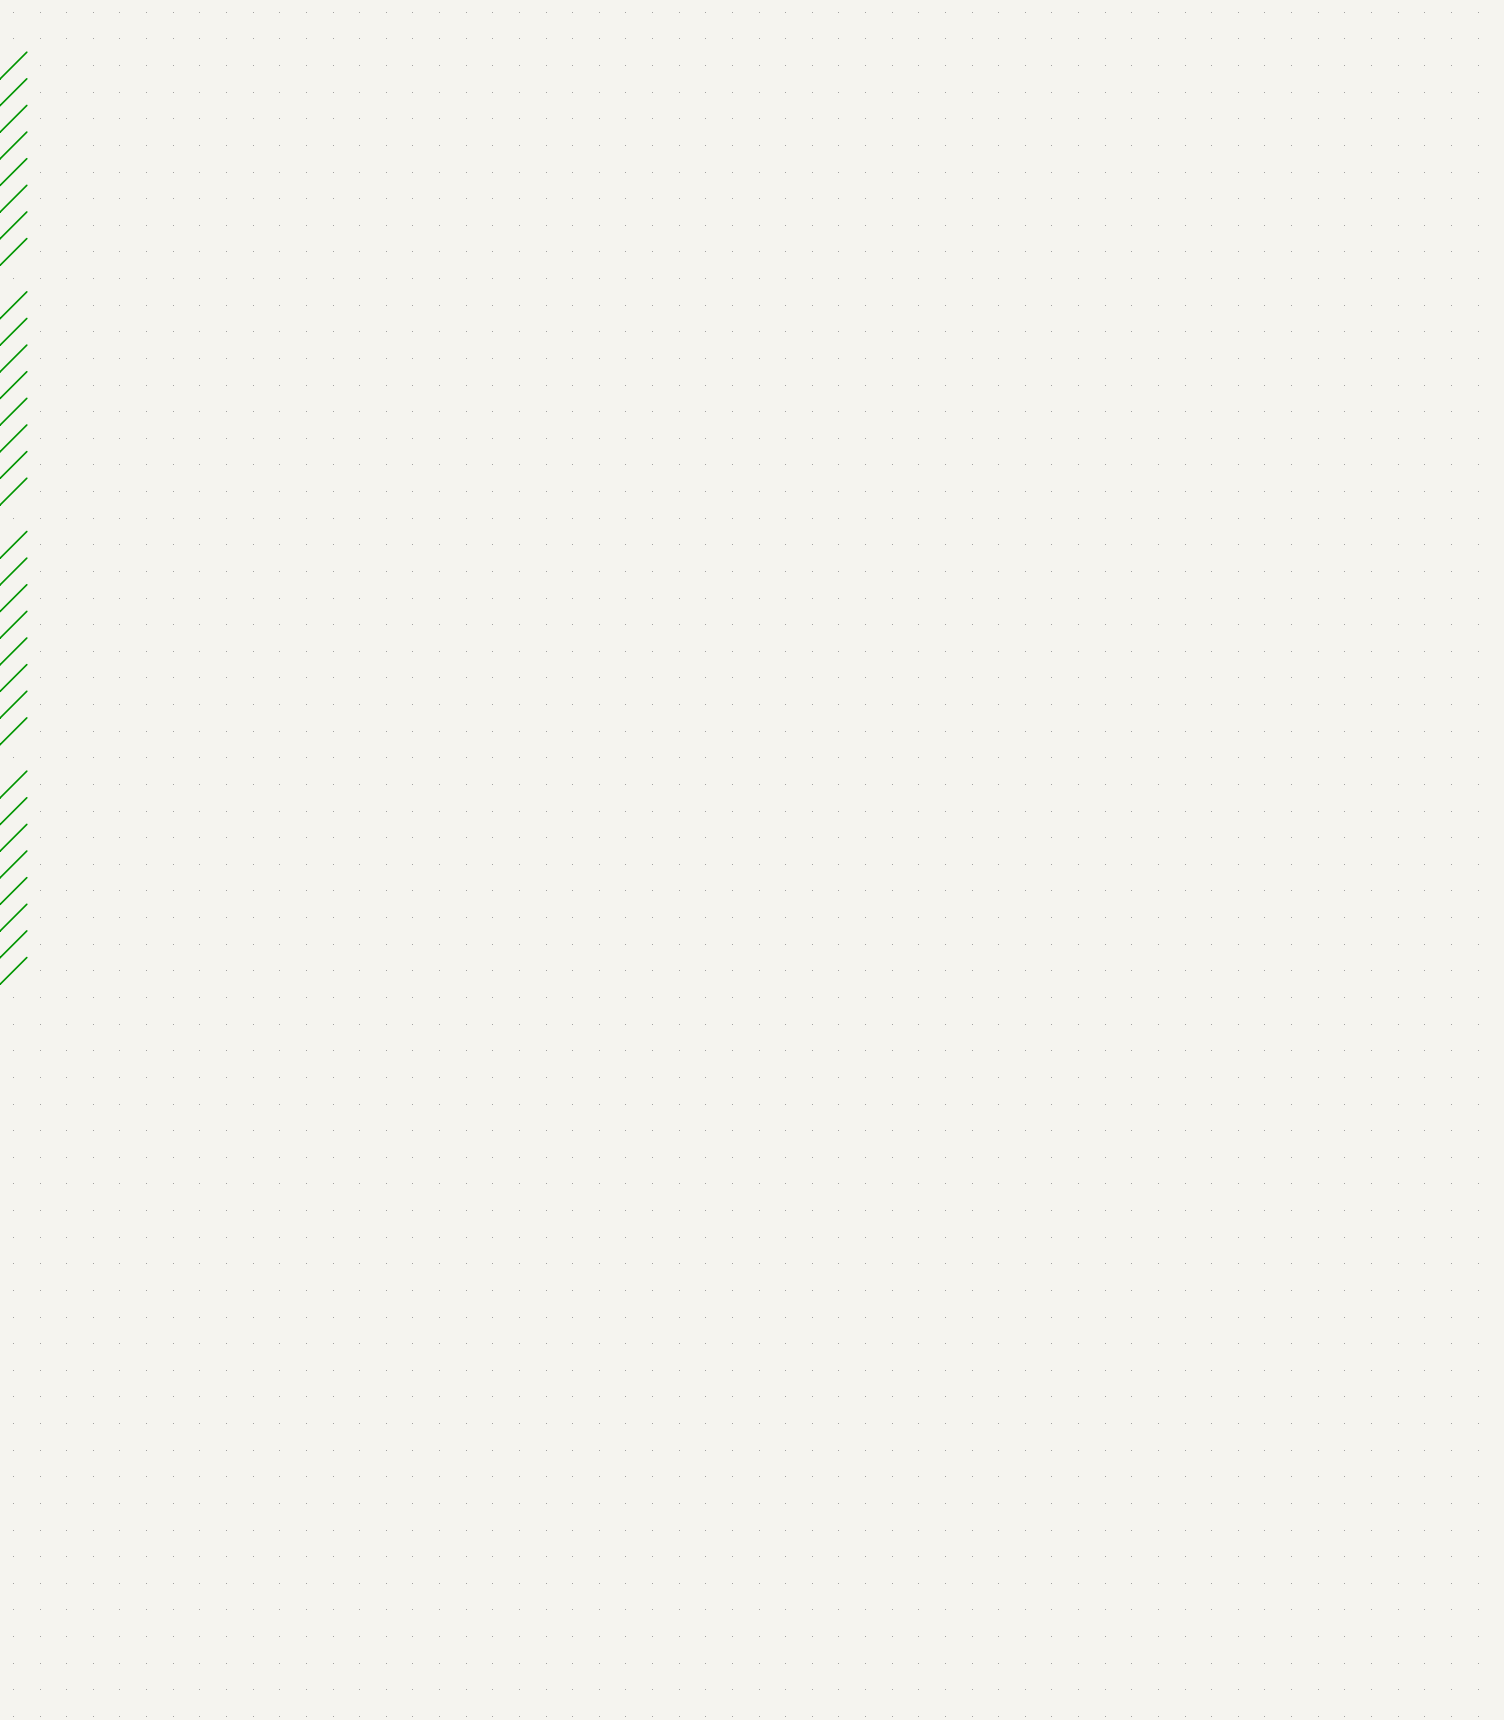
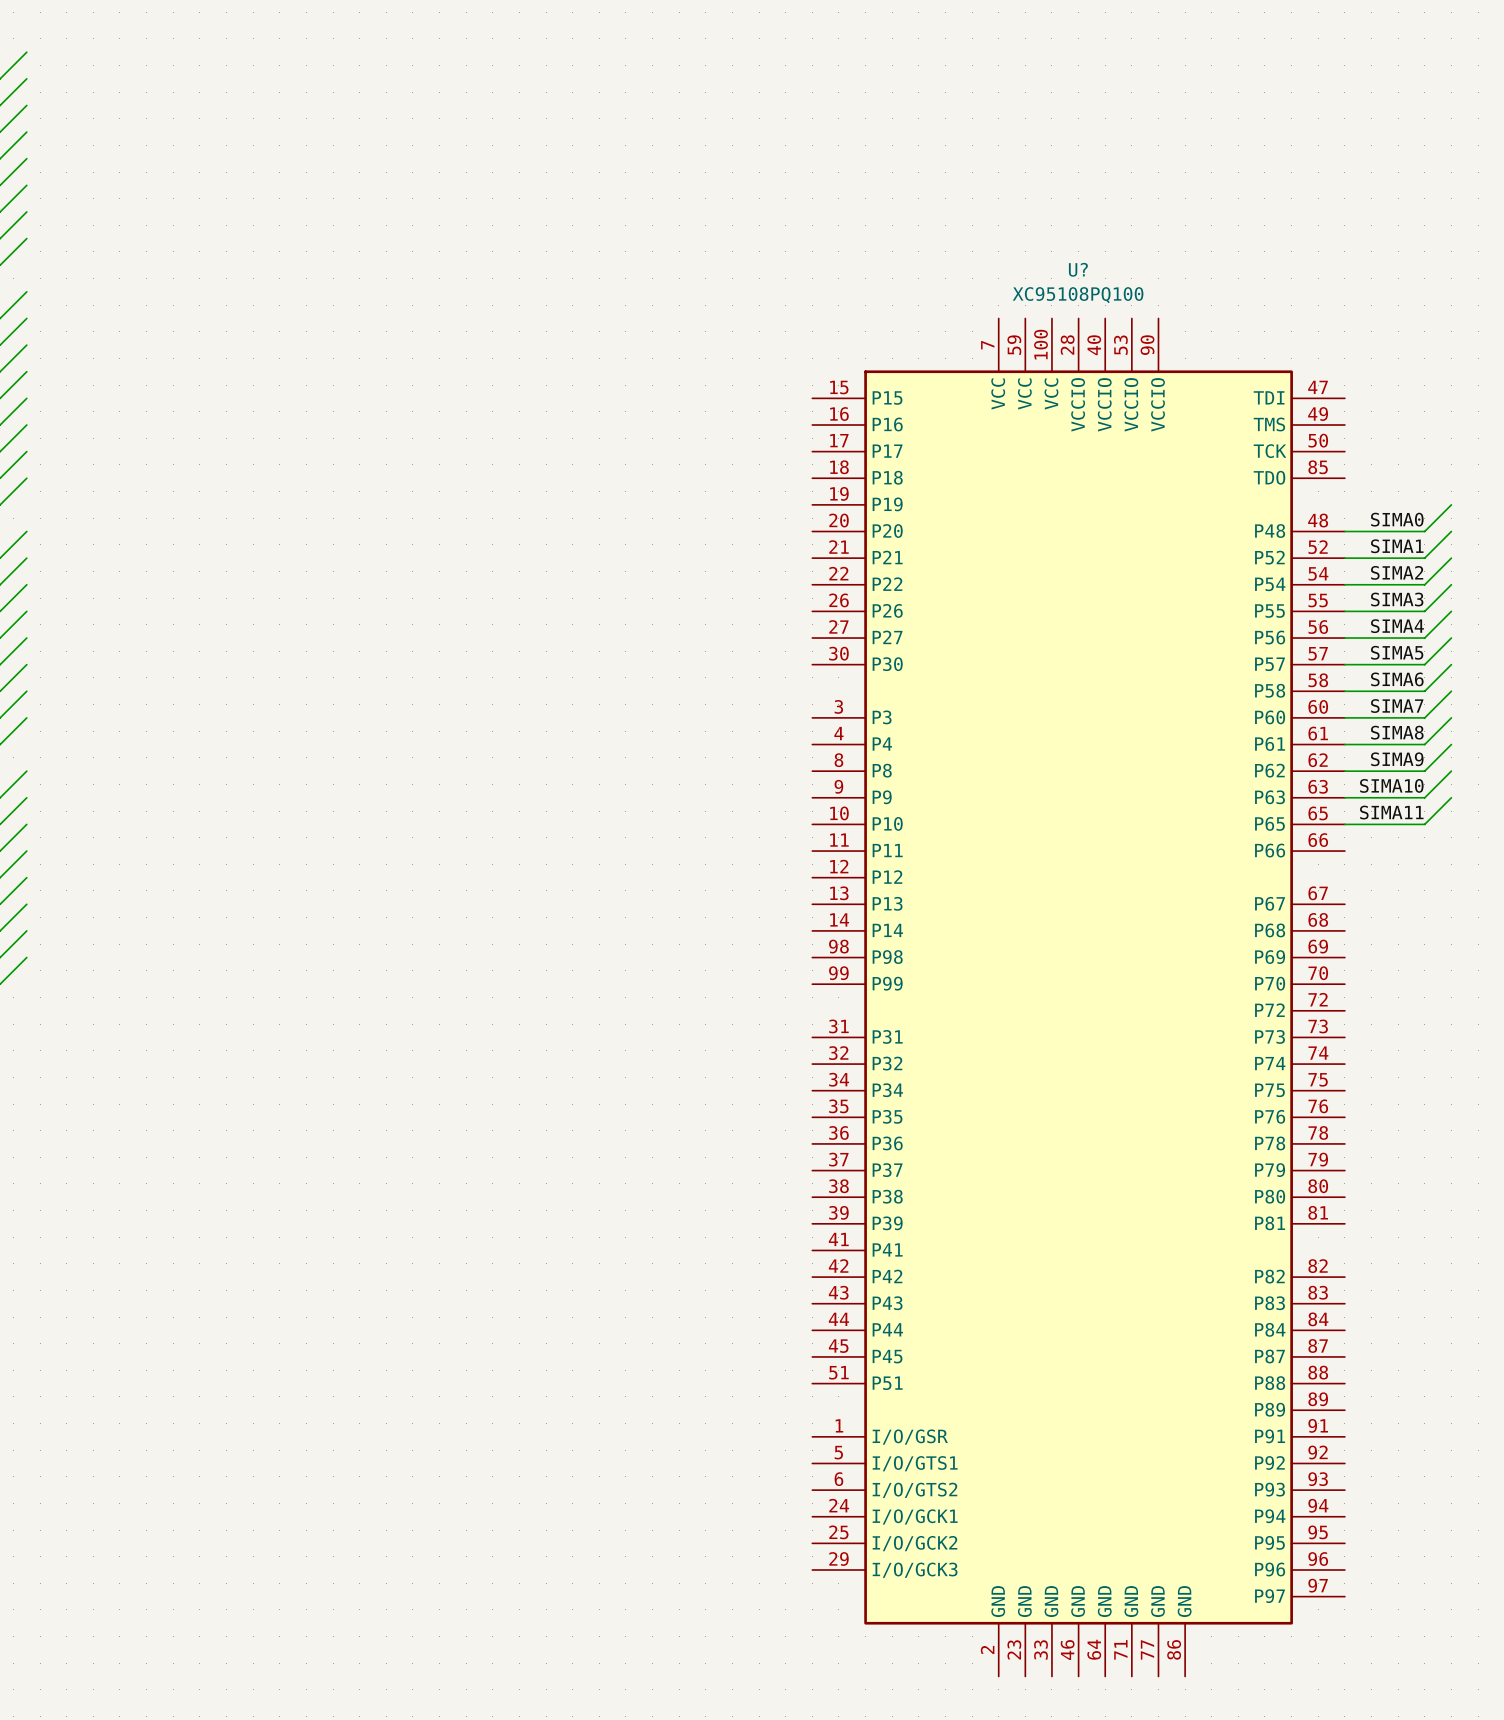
wire: none -> (1451, 504) (1424, 531) (1344, 531)
label: none -> SIMA0 (1397, 519)
wire: none -> (1451, 531) (1424, 558) (1344, 558)
label: none -> SIMA1 (1397, 546)
wire: none -> (1451, 558) (1424, 584) (1344, 584)
label: none -> SIMA2 (1397, 572)
wire: none -> (1451, 584) (1424, 611) (1344, 611)
label: none -> SIMA3 (1397, 599)
wire: none -> (1451, 611) (1424, 638) (1344, 638)
label: none -> SIMA4 (1397, 626)
wire: none -> (1451, 638) (1424, 664) (1344, 664)
label: none -> SIMA5 (1397, 652)
wire: none -> (1451, 664) (1424, 691) (1344, 691)
label: none -> SIMA6 (1397, 679)
wire: none -> (1451, 691) (1424, 717) (1344, 717)
label: none -> SIMA7 (1397, 706)
wire: none -> (1451, 717) (1424, 744) (1344, 744)
label: none -> SIMA8 (1397, 732)
wire: none -> (1451, 744) (1424, 771) (1344, 771)
label: none -> SIMA9 (1397, 759)
wire: none -> (1451, 771) (1424, 797) (1344, 797)
label: none -> SIMA10 (1391, 785)
wire: none -> (1451, 797) (1424, 824) (1344, 824)
label: none -> SIMA11 (1391, 812)
U?: none -> XC95108PQ100 (1078, 997)

